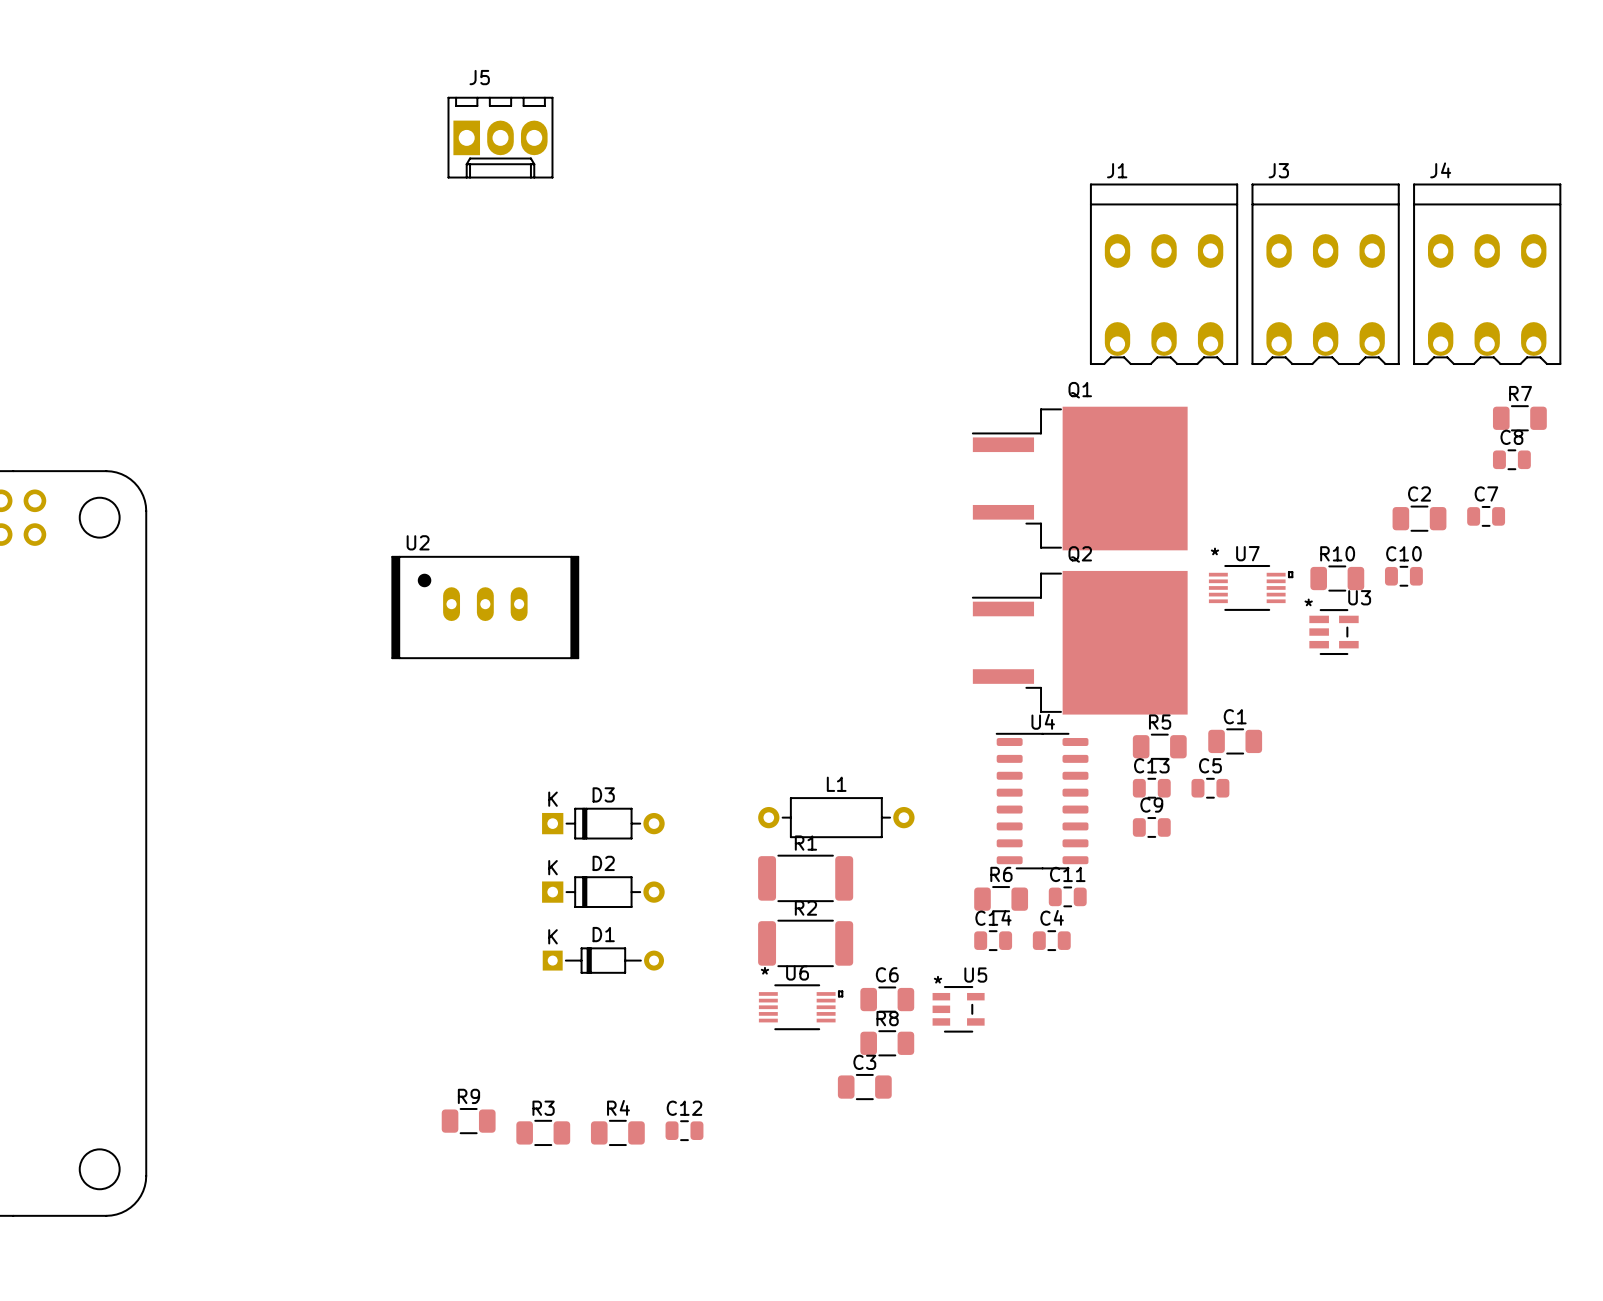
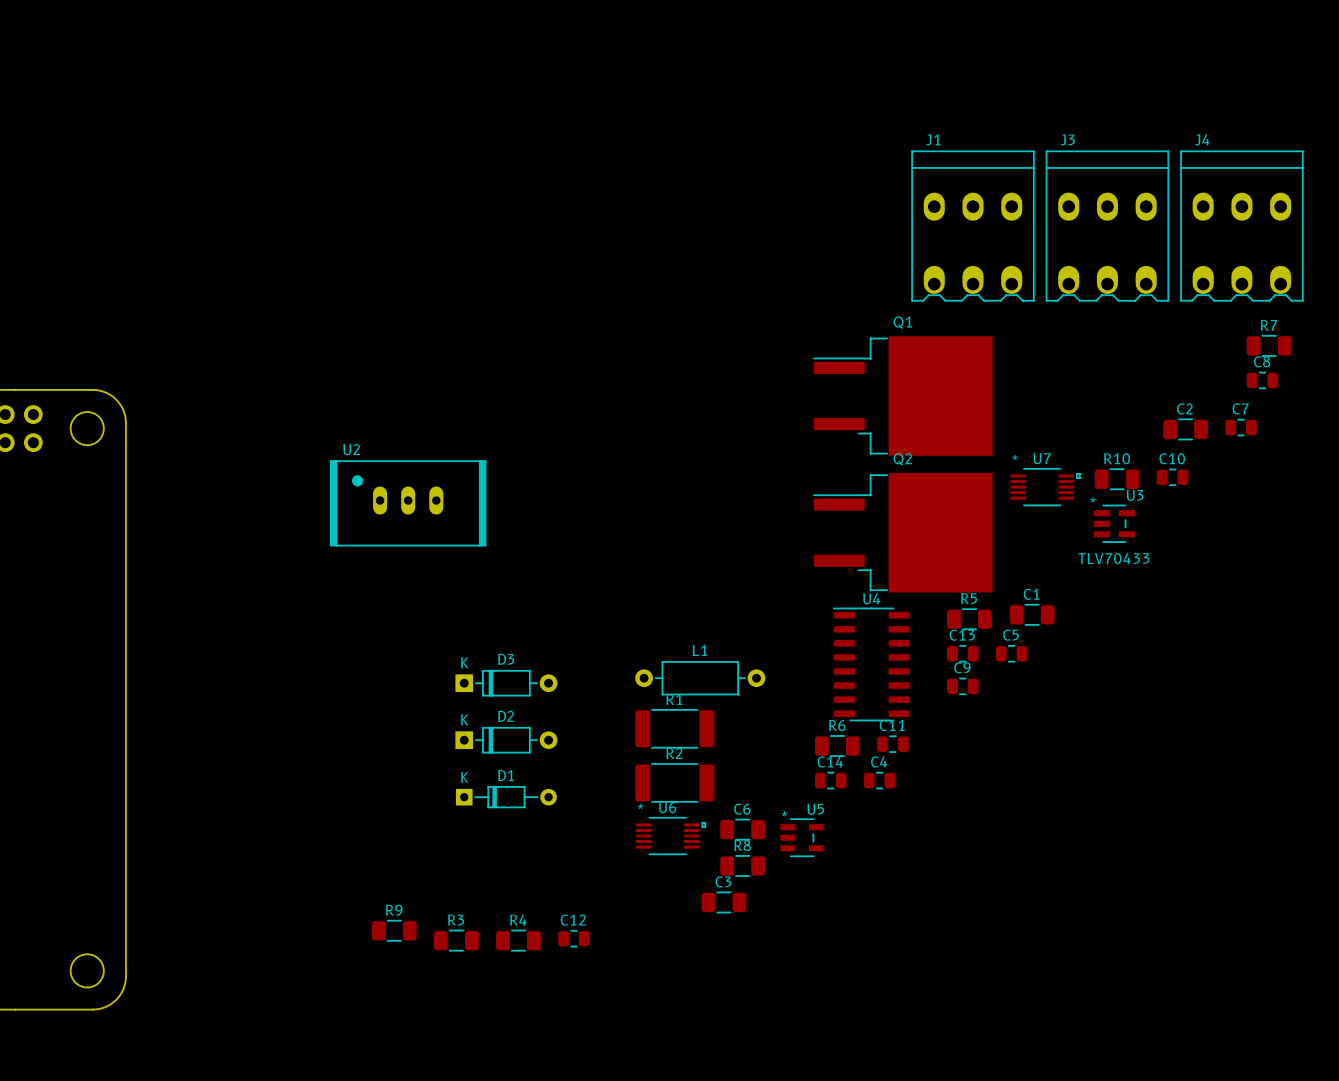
J5: (500, 137) -> none
U3 value: none -> TLV70433 (1113, 558)

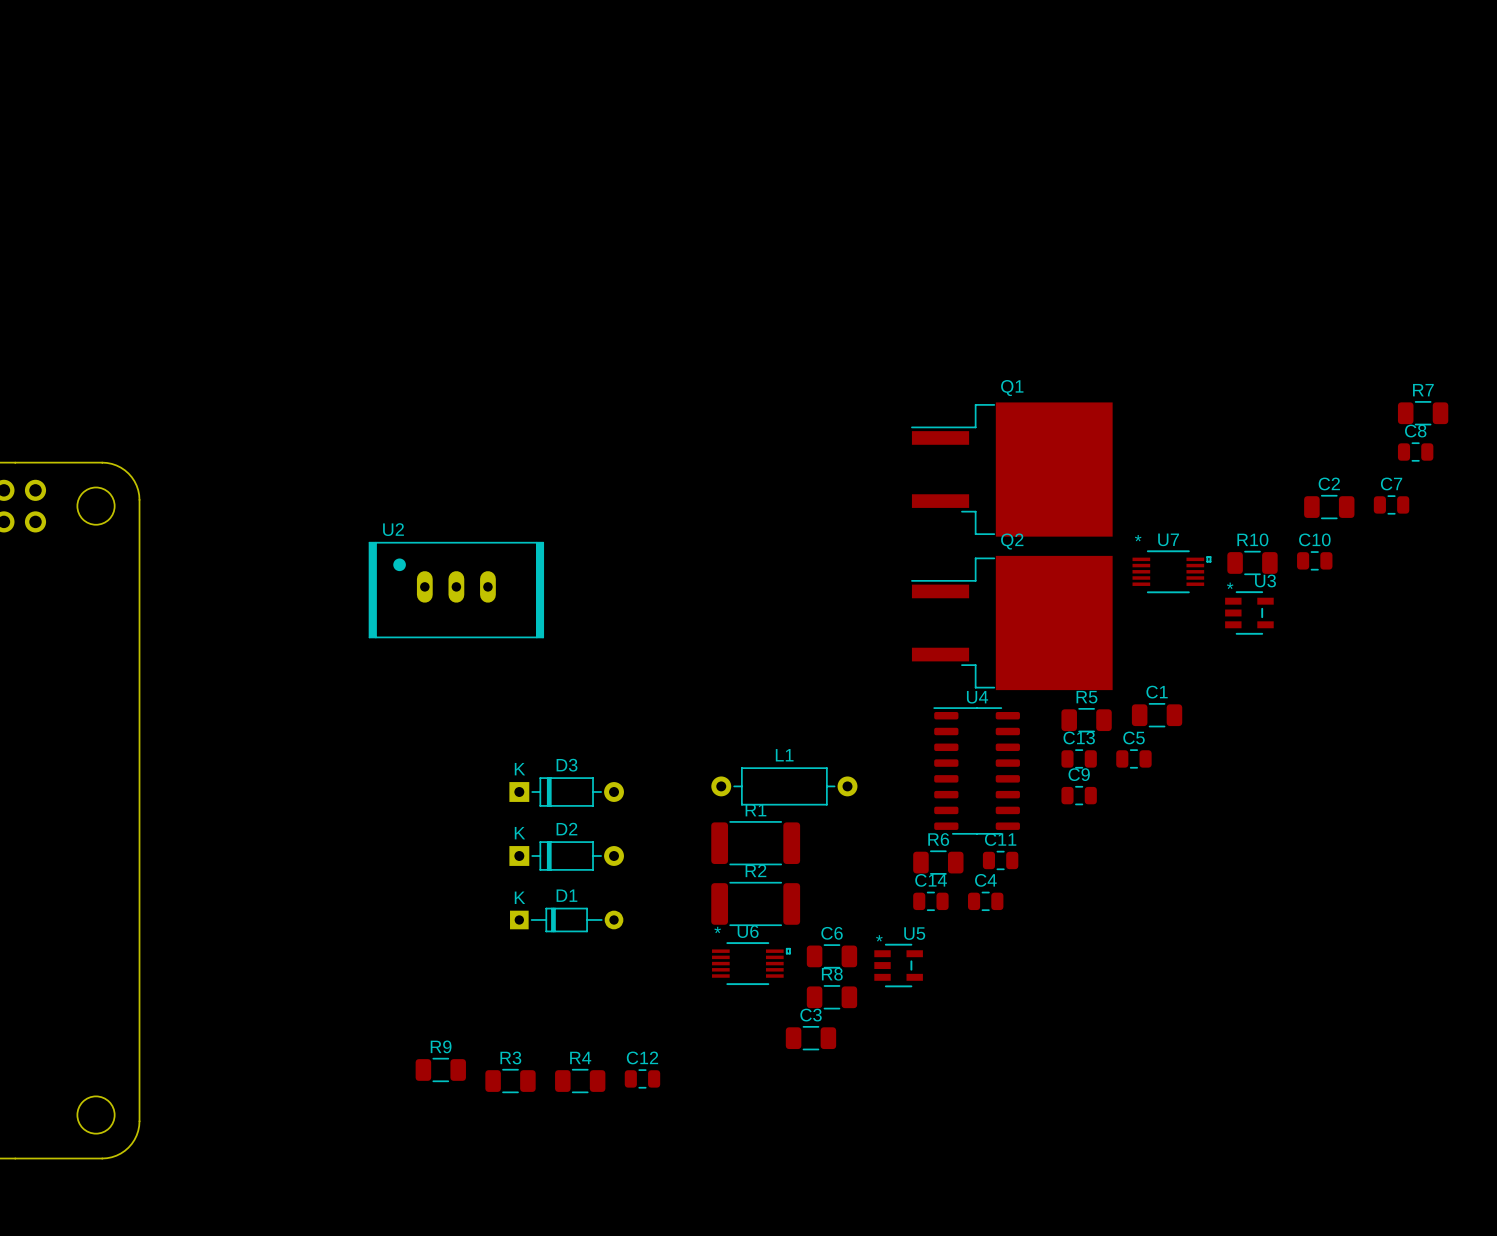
J1: (972, 226) -> none
J3: (1107, 226) -> none
J4: (1241, 226) -> none
U3 footprint: [1093, 504, 1135, 543] -> [1225, 591, 1274, 635]
U3 value: TLV70433 (1113, 558) -> none

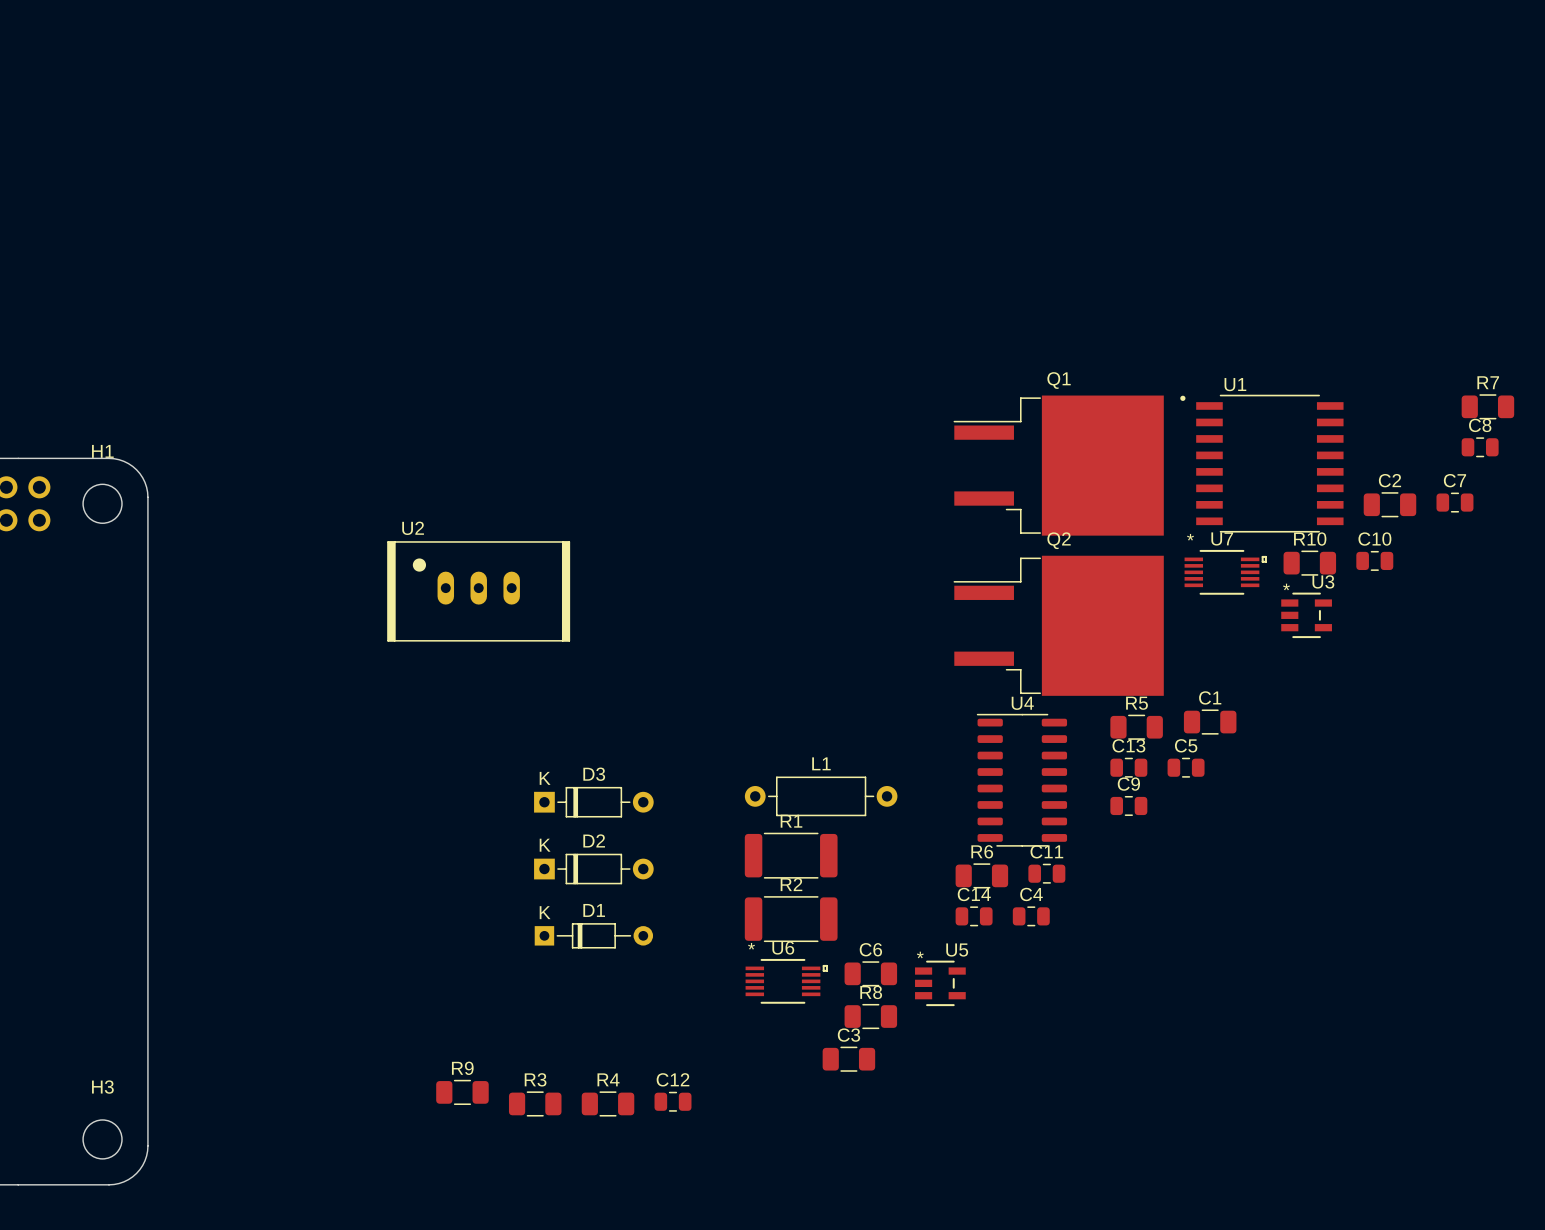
H1 name: none -> H1 (102, 451)
U1: none -> (1261, 463)
H3 name: none -> H3 (102, 1087)

